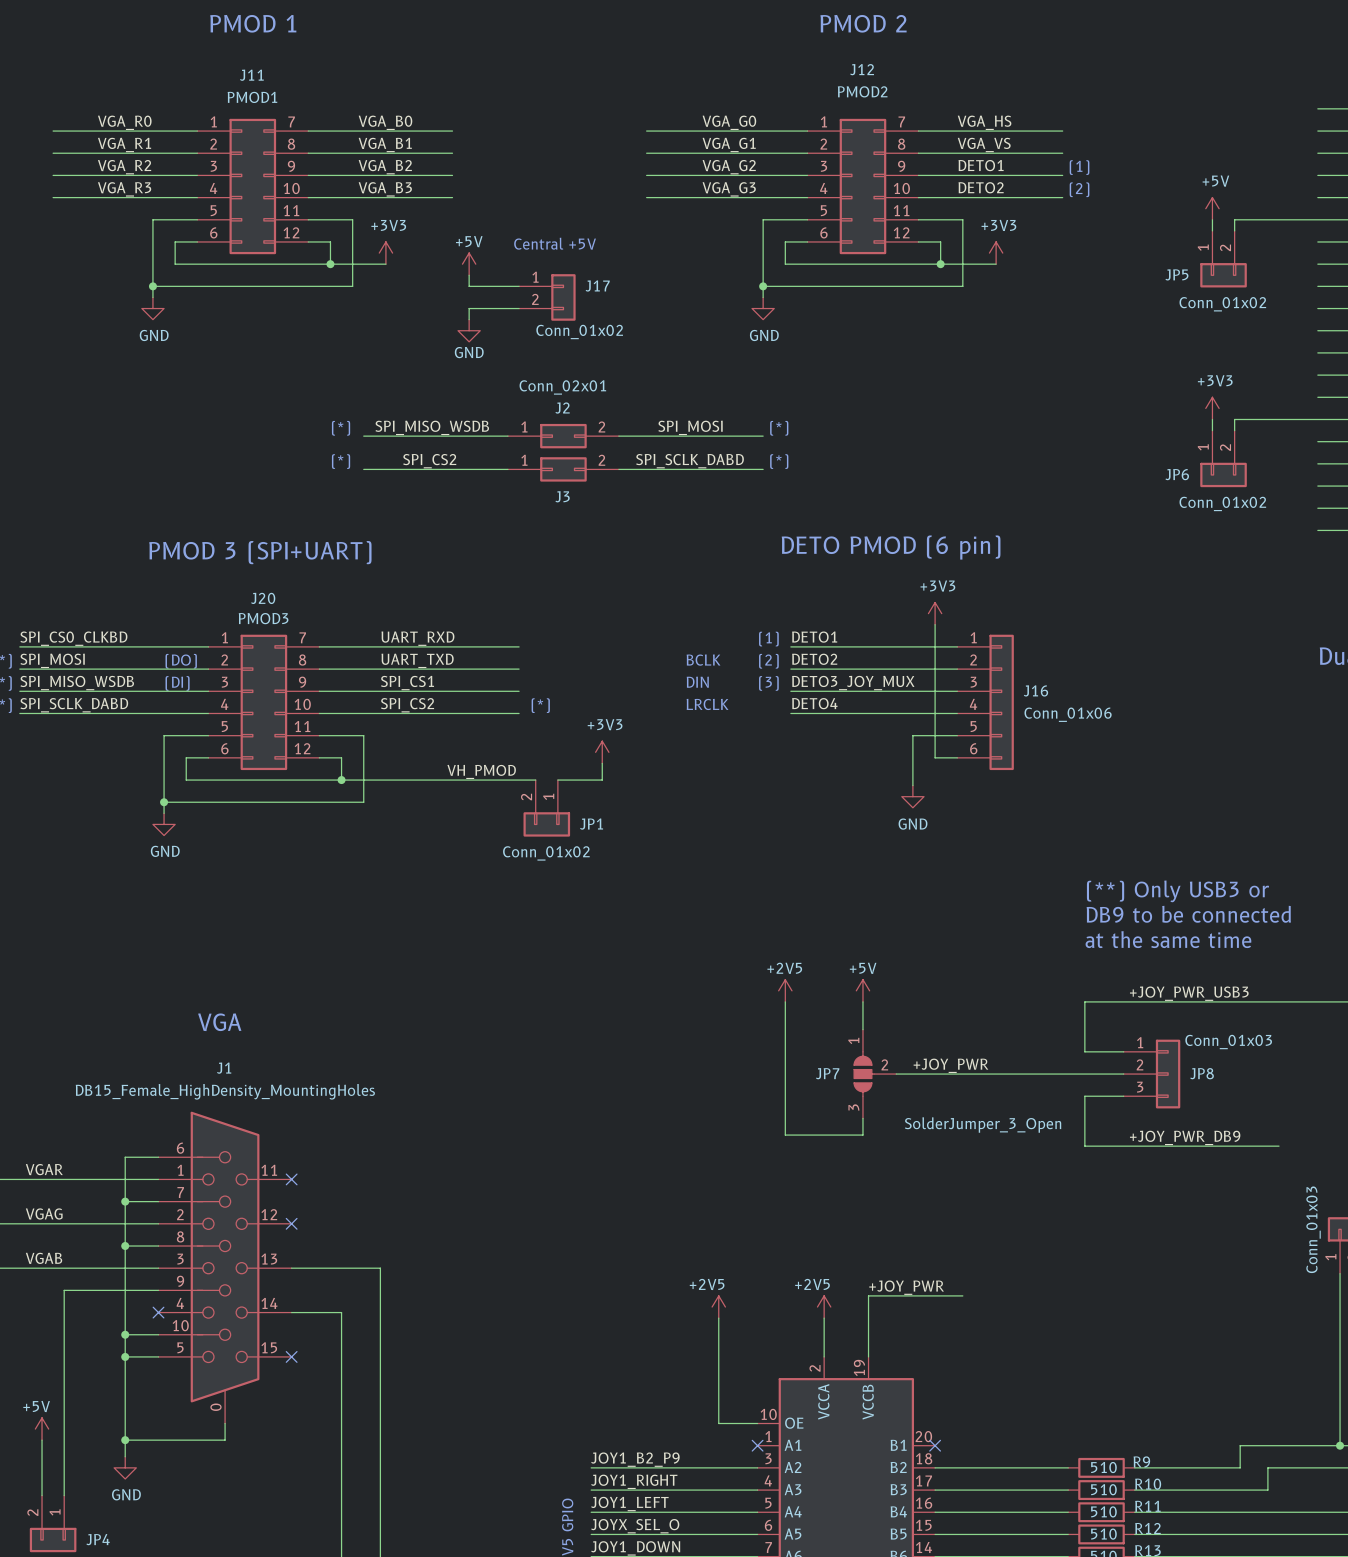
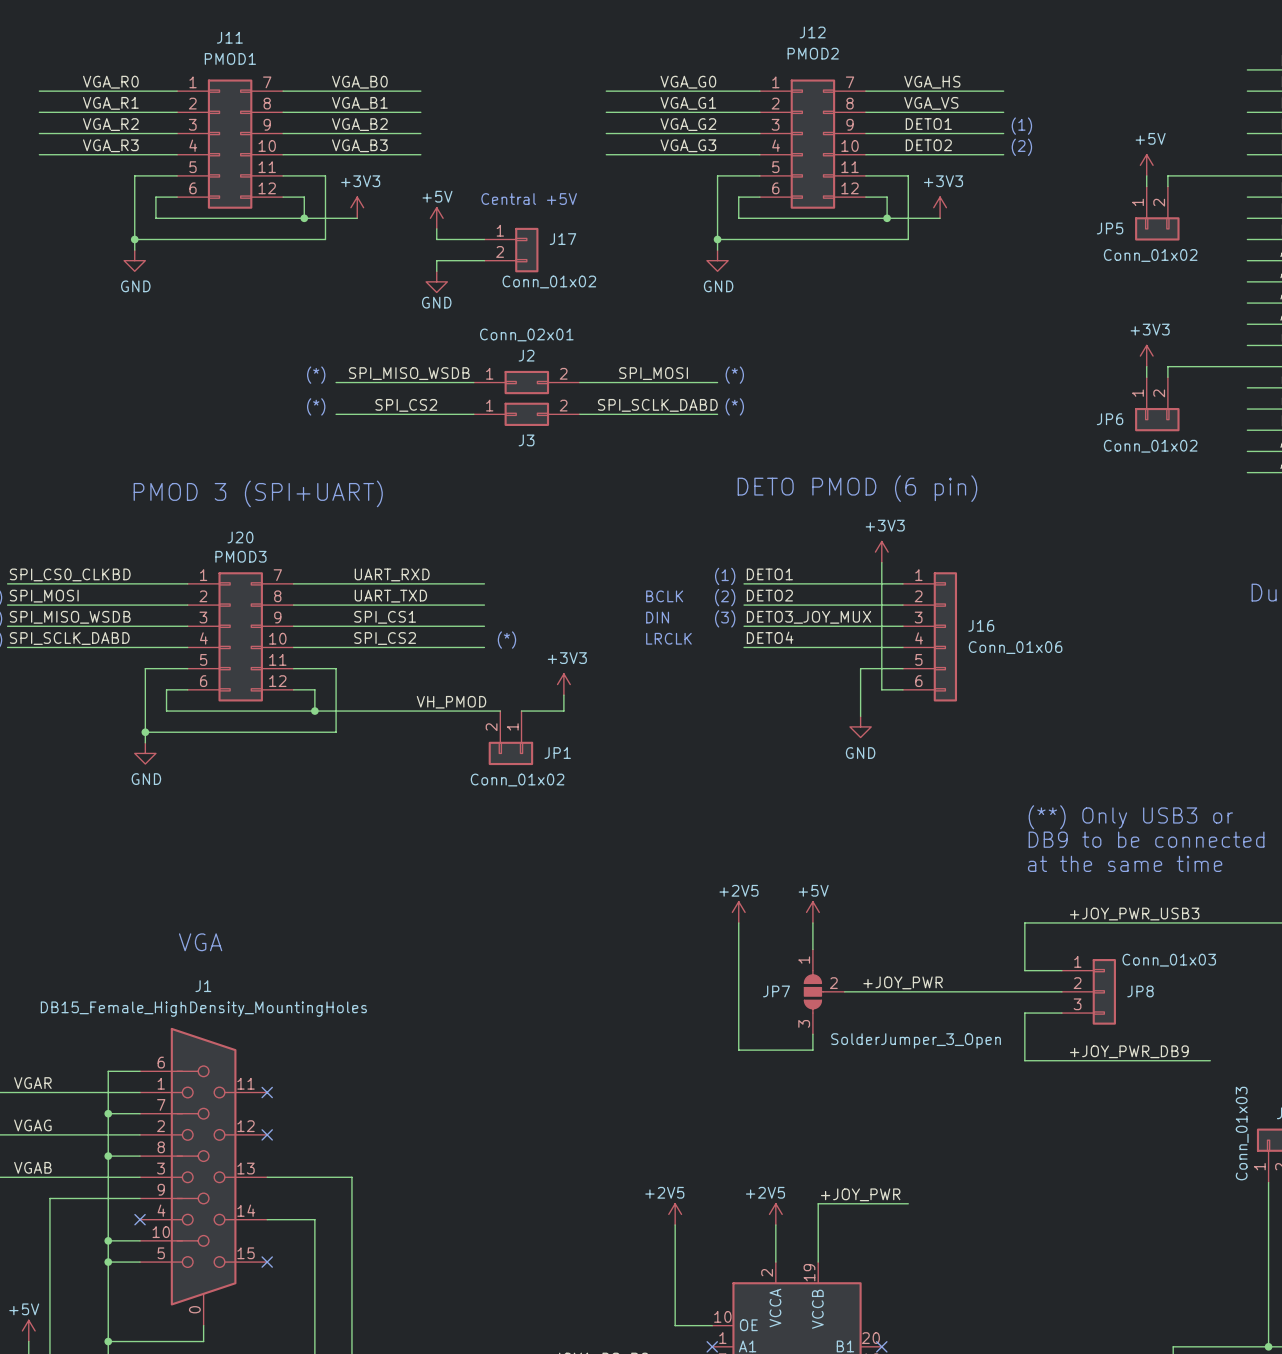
text: (DO) (181, 661) -> none
text: (DI) (177, 683) -> none

